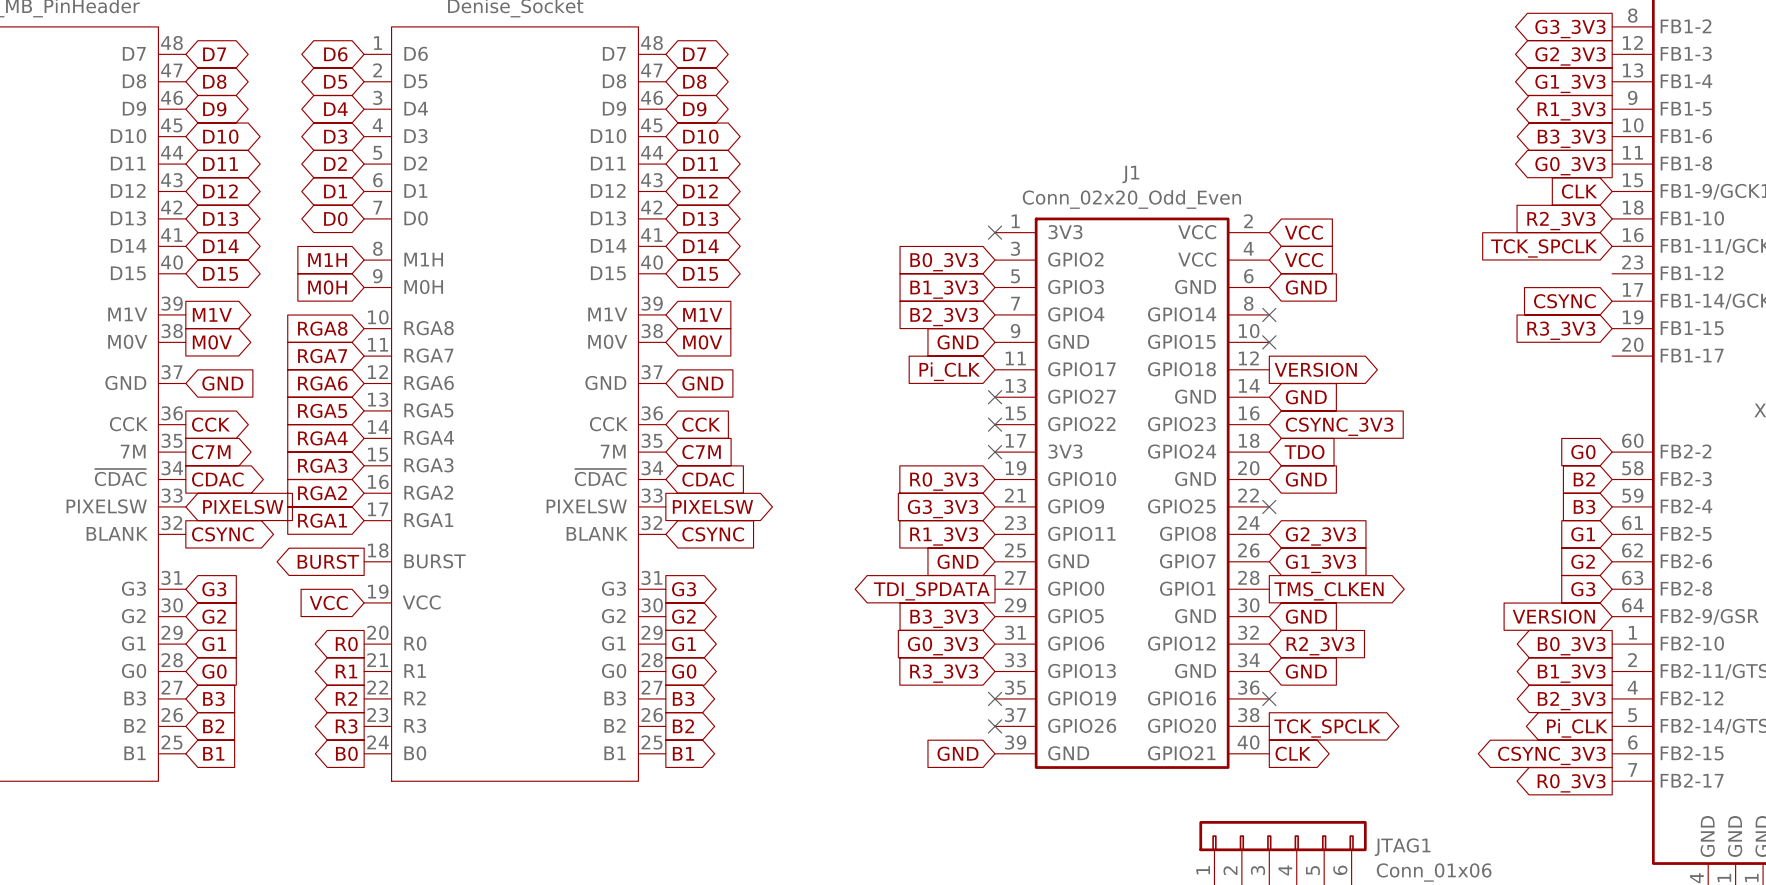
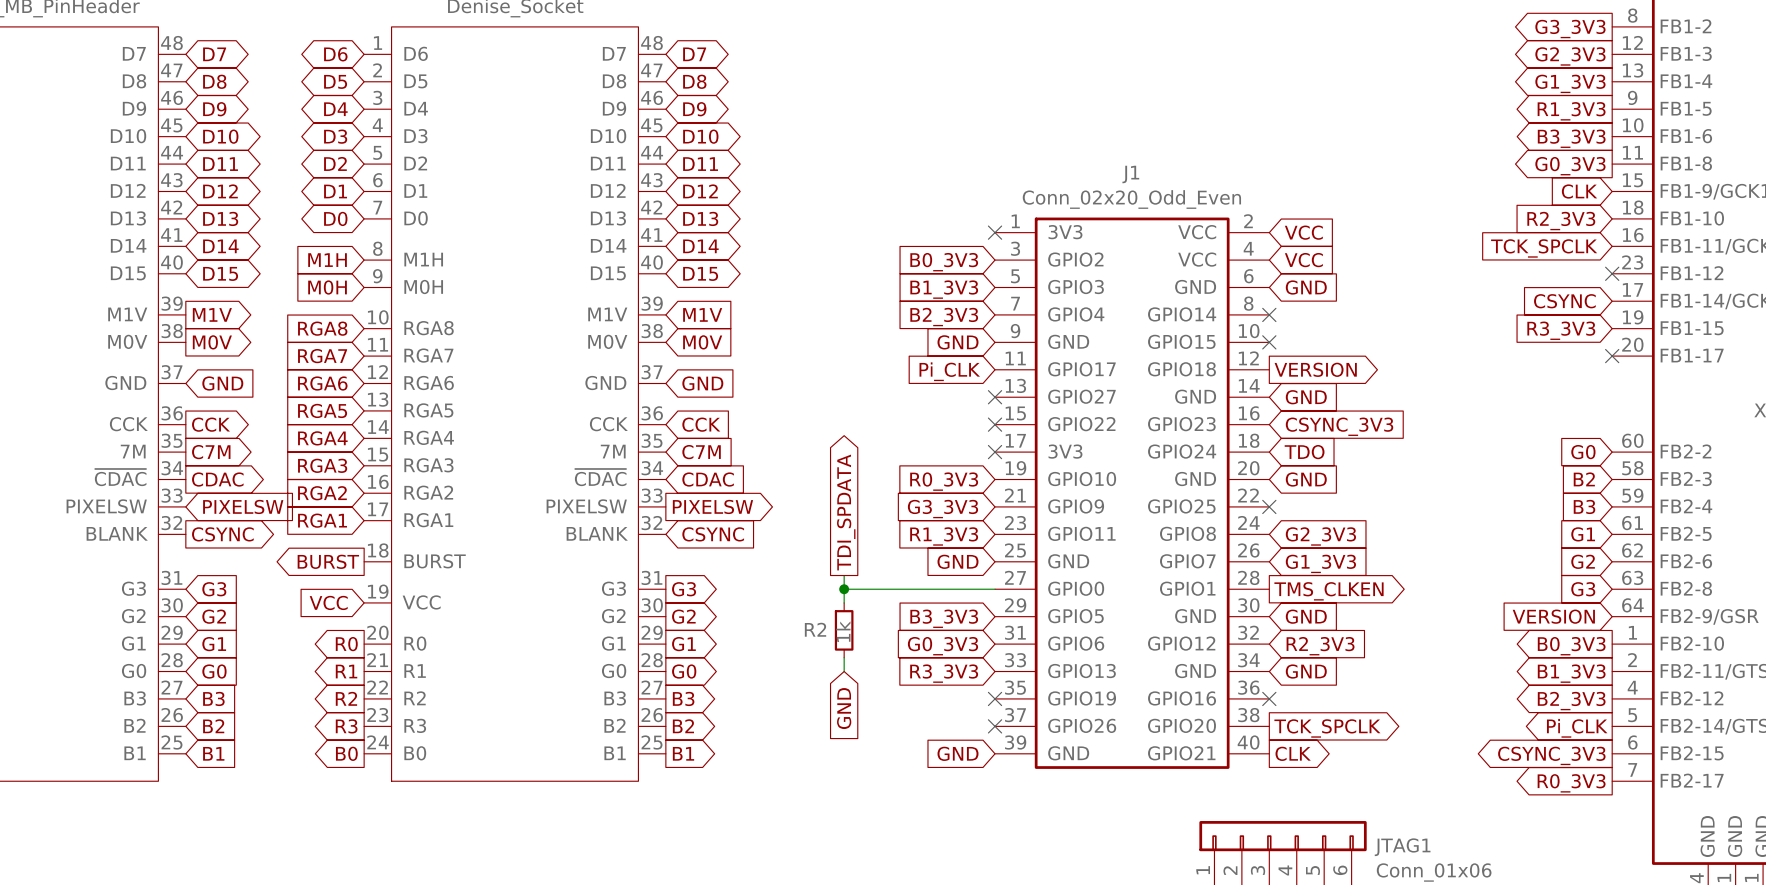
no-connect mark: none -> (1612, 273)
no-connect mark: none -> (1612, 356)
wire: none -> (844, 575) (844, 602)
wire: none -> (844, 589) (995, 589)
junction: none -> (844, 589)
global label rotation: 0° (931, 591) -> 90° clockwise (846, 512)
R2: none -> 1k (844, 630)
wire: none -> (844, 657) (844, 671)
global label: none -> GND (844, 708)

